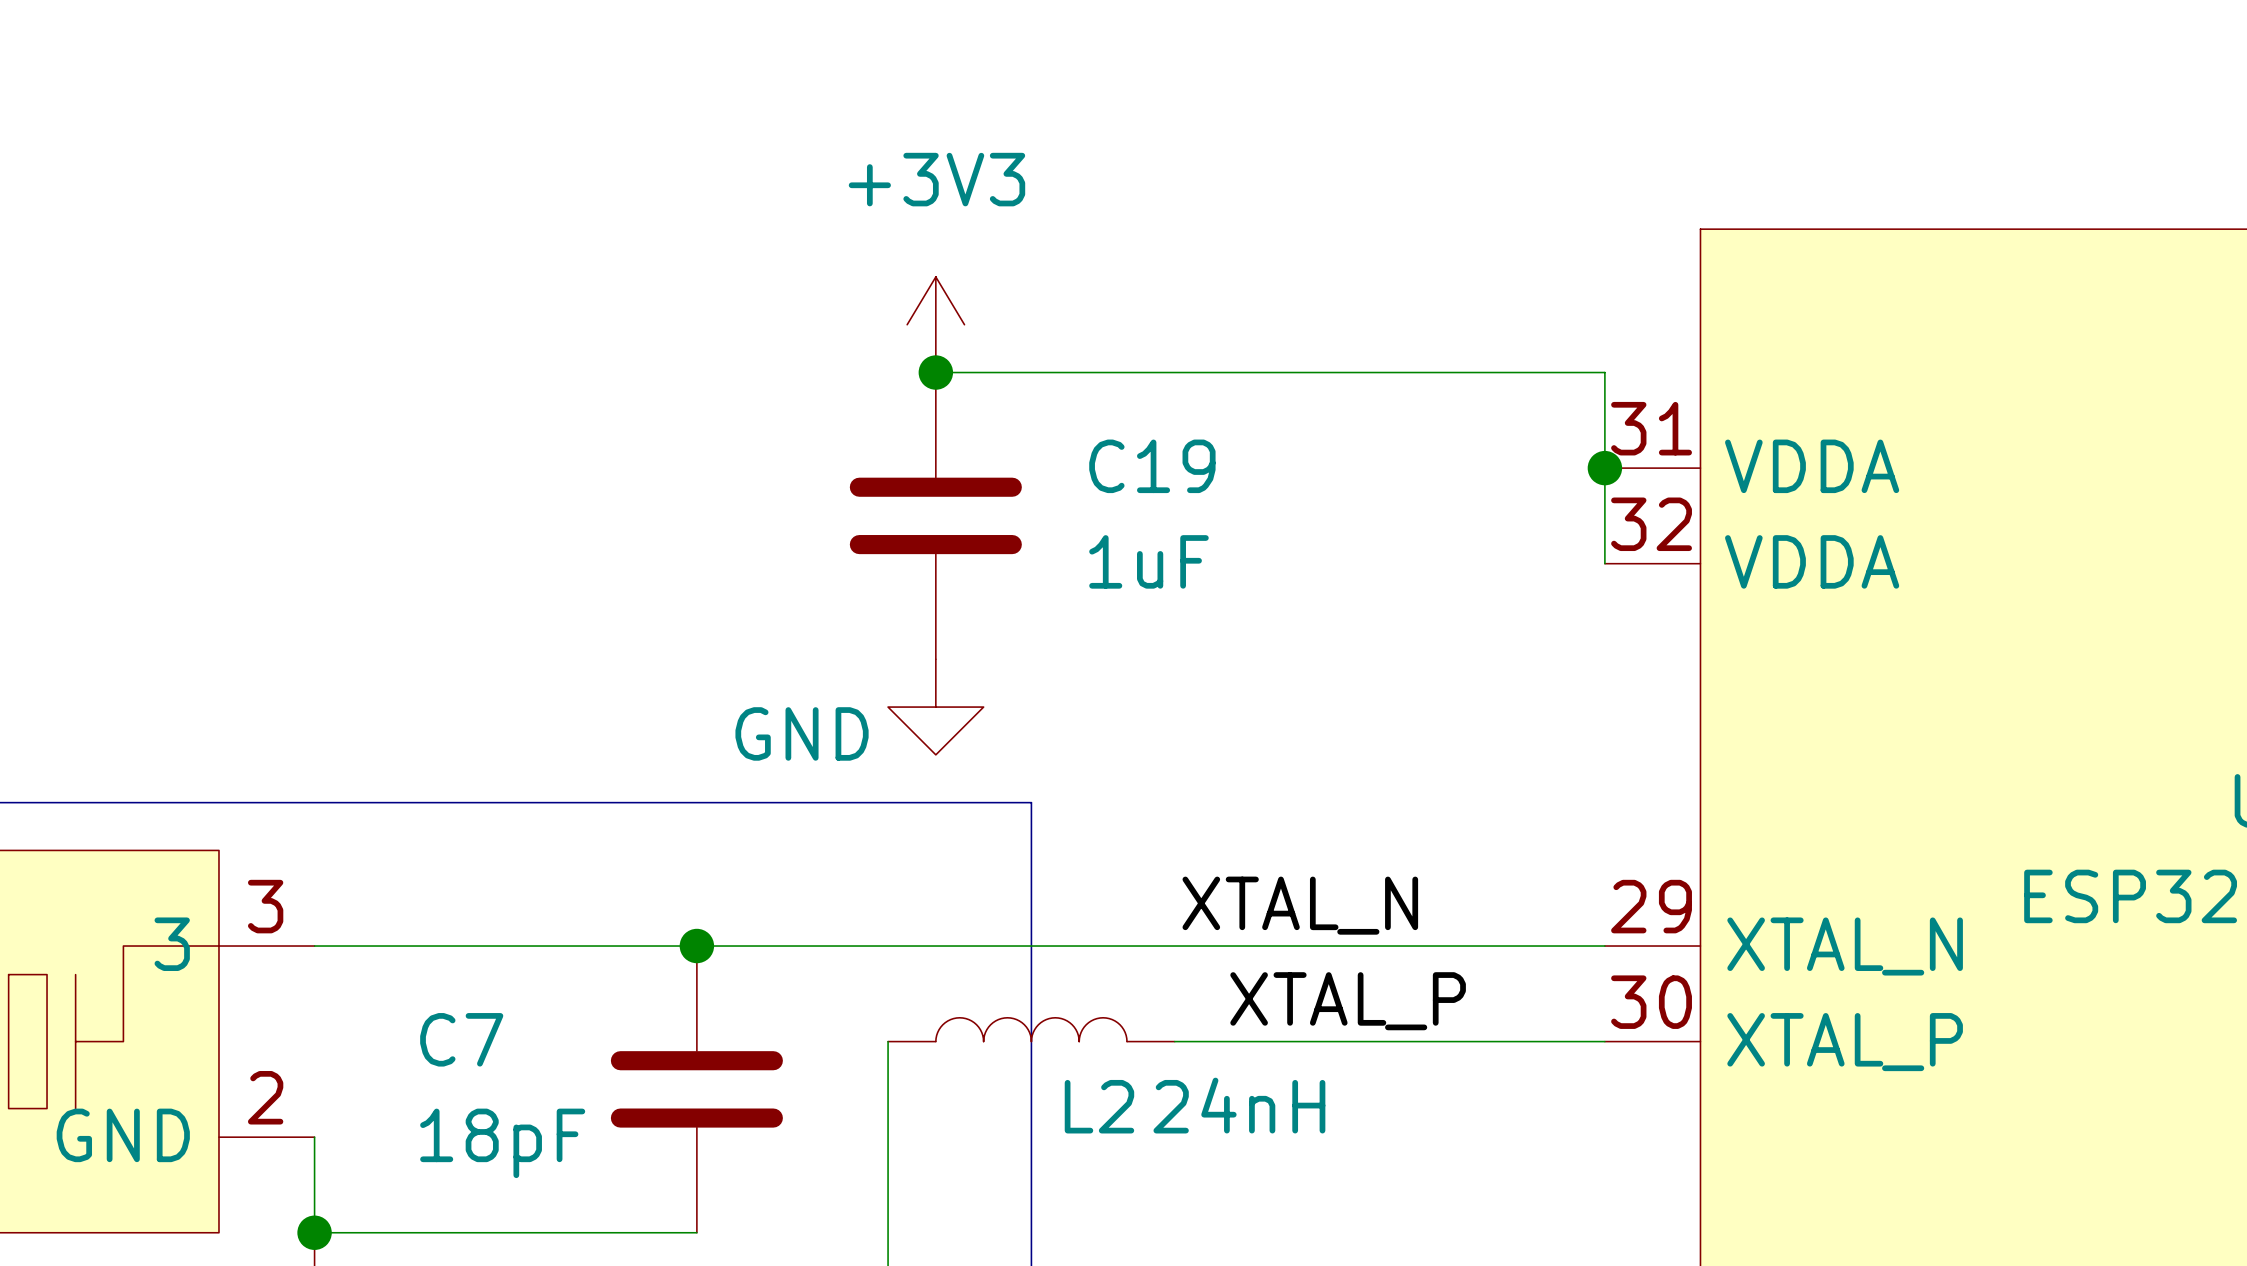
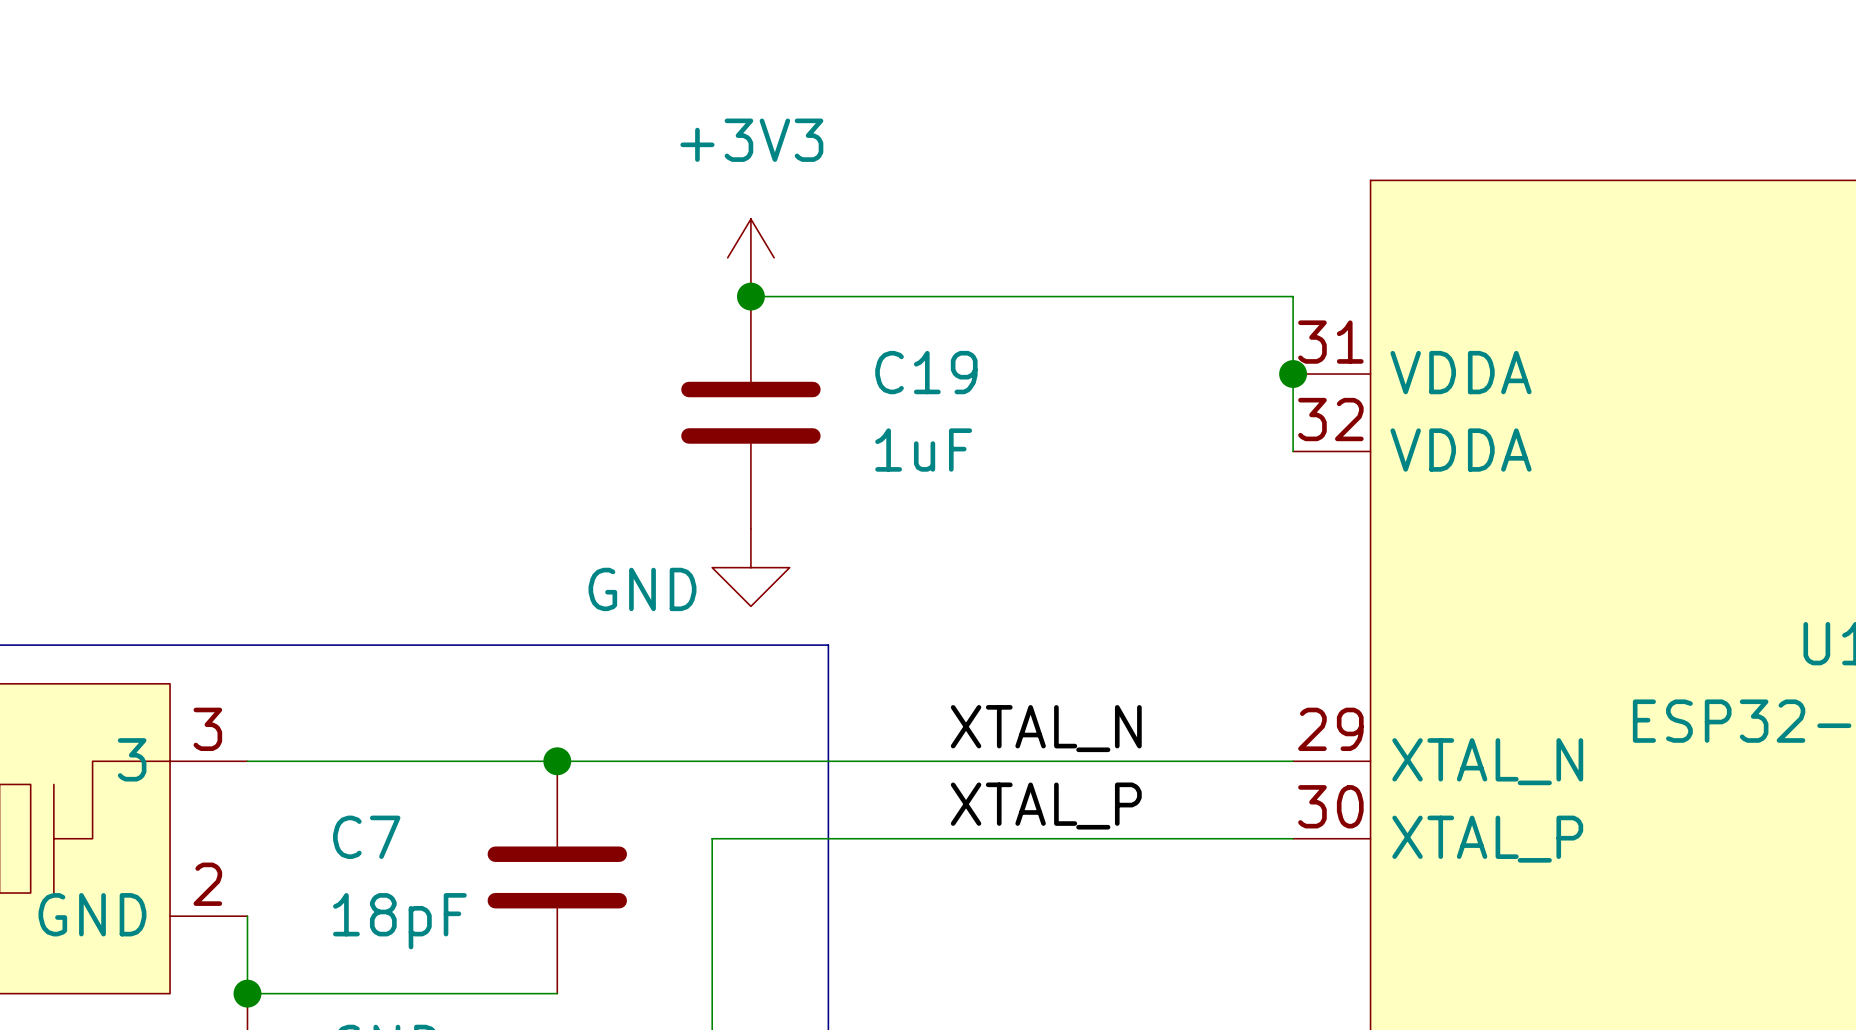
label position: XTAL_P (1348, 1001) -> XTAL_P (1046, 806)
L2: 24nH (1031, 1029) -> none
wire: none -> (712, 838) (944, 838)

